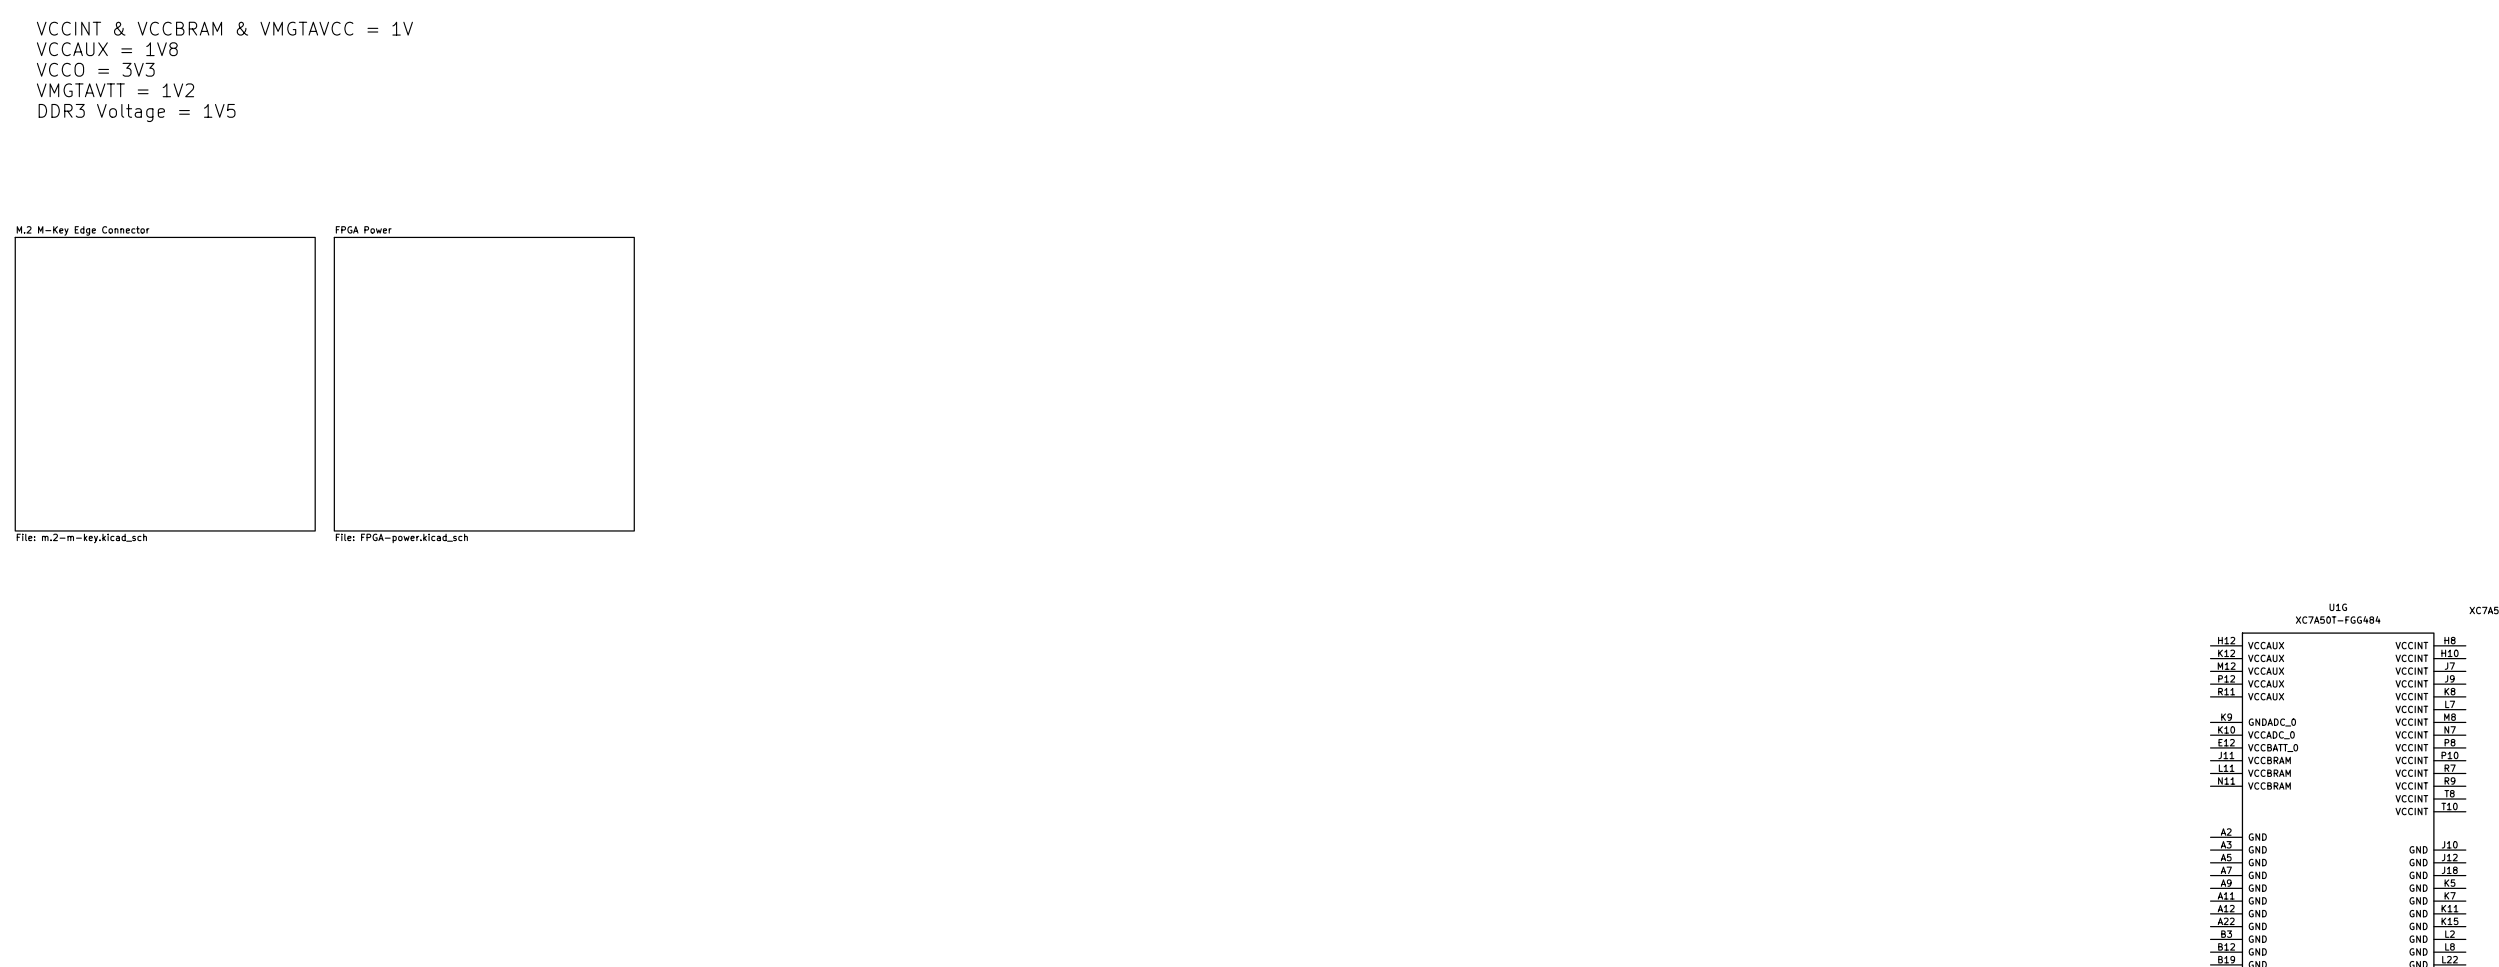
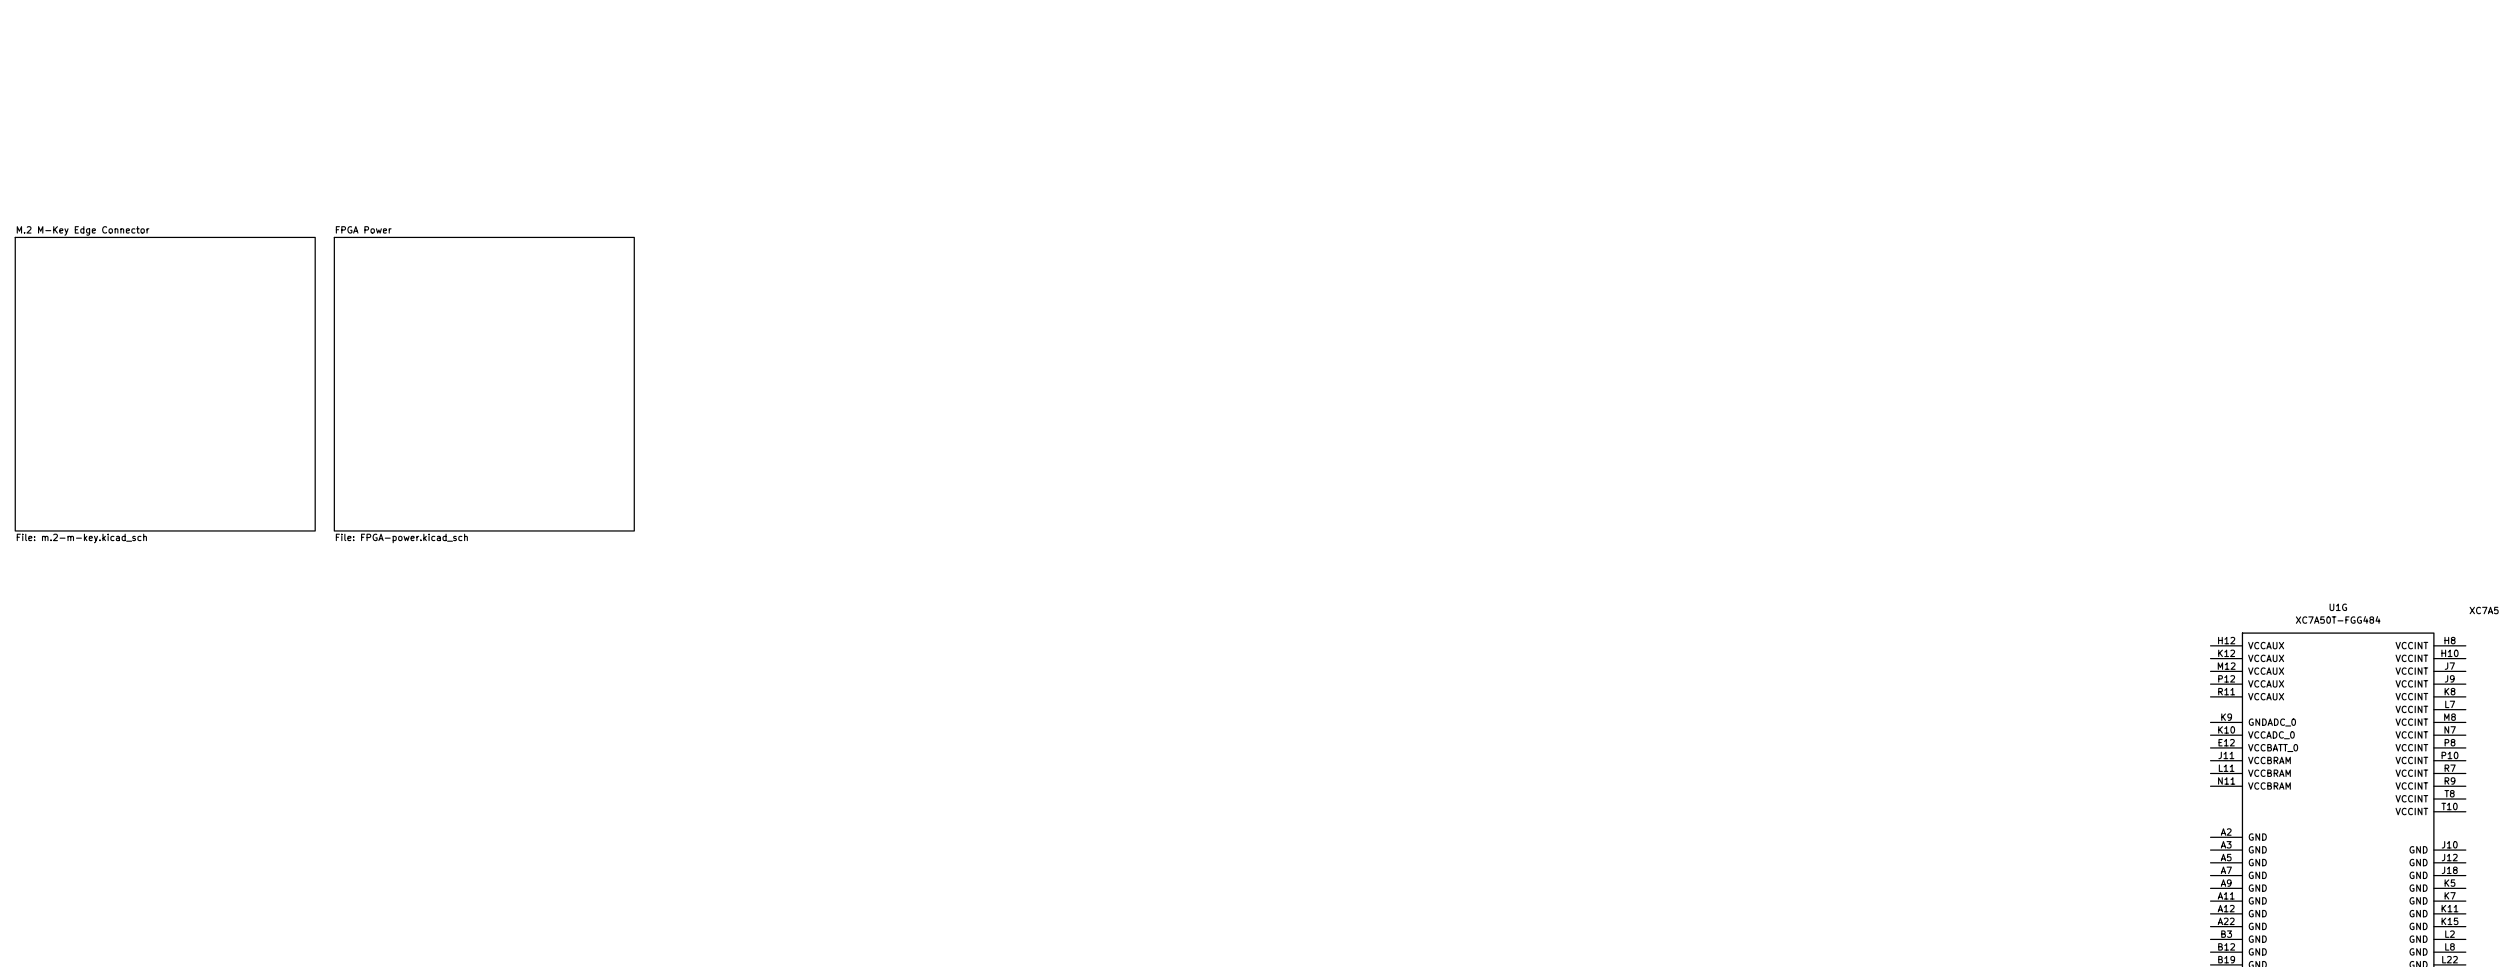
text: VCCINT & VCCBRAM & VMGTAVCC = 1V (224, 28) -> none
text: VCCAUX = 1V8 (107, 49) -> none
text: VCCO = 3V3 (95, 69) -> none
text: VMGTAVTT = 1V2 (115, 90) -> none
text: DDR3 Voltage = 1V5 (137, 112) -> none

